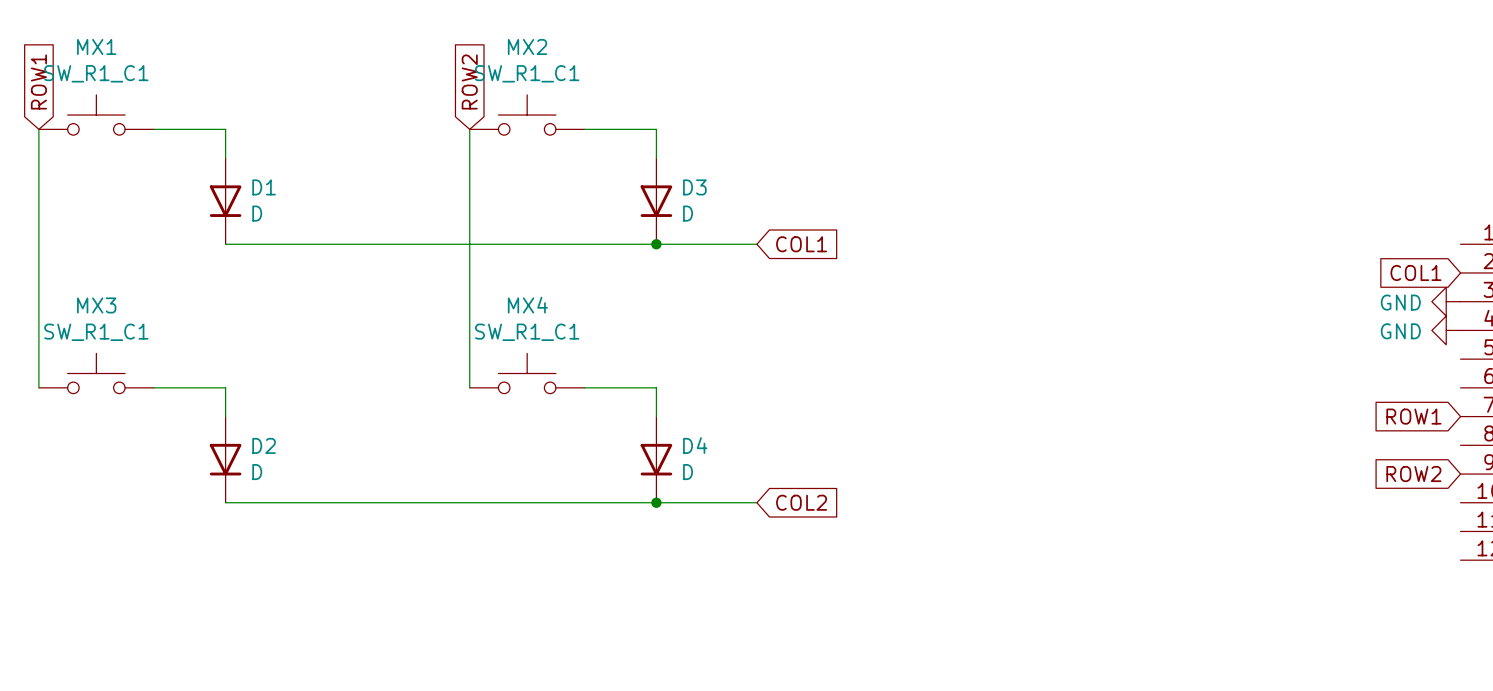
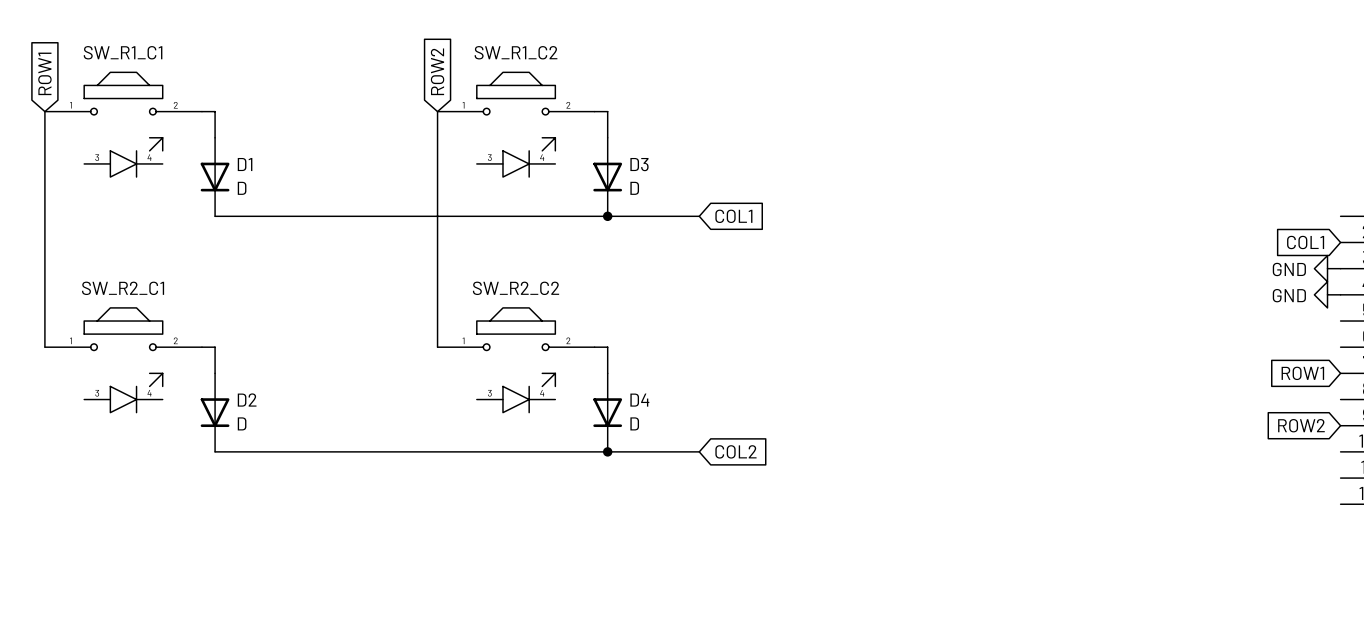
MX1: SW_R1_C1 (96, 115) -> none
MX2: SW_R1_C1 (527, 115) -> none
SW_R1_C1: none -> (123, 124)
SW_R1_C2: none -> (516, 124)
MX3: SW_R1_C1 (96, 373) -> none
MX4: SW_R1_C1 (527, 373) -> none
SW_R2_C1: none -> (123, 360)
SW_R2_C2: none -> (516, 360)

